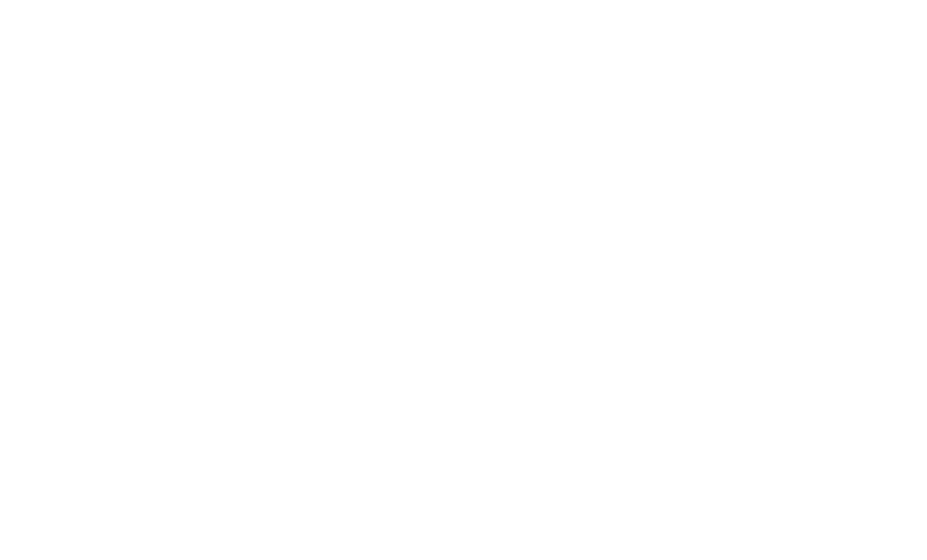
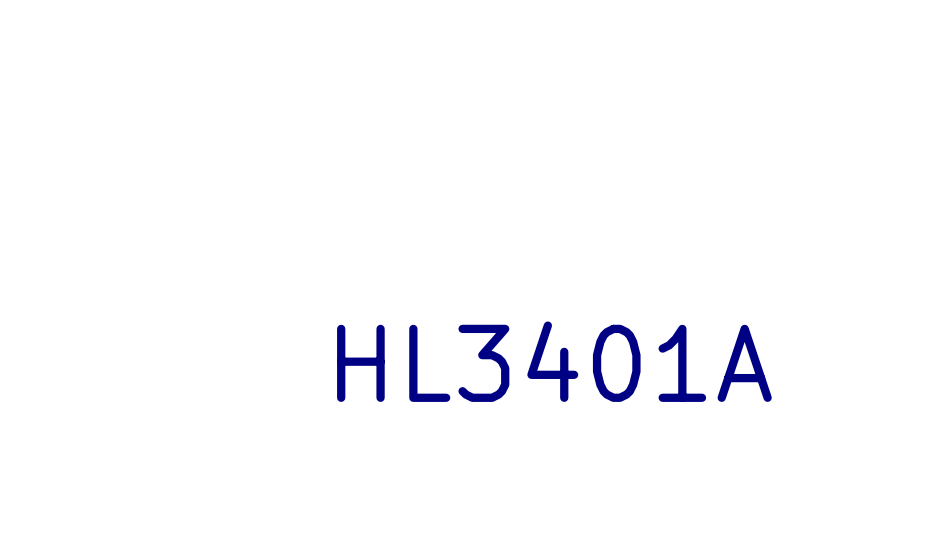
text: none -> HL3401A (554, 361)

